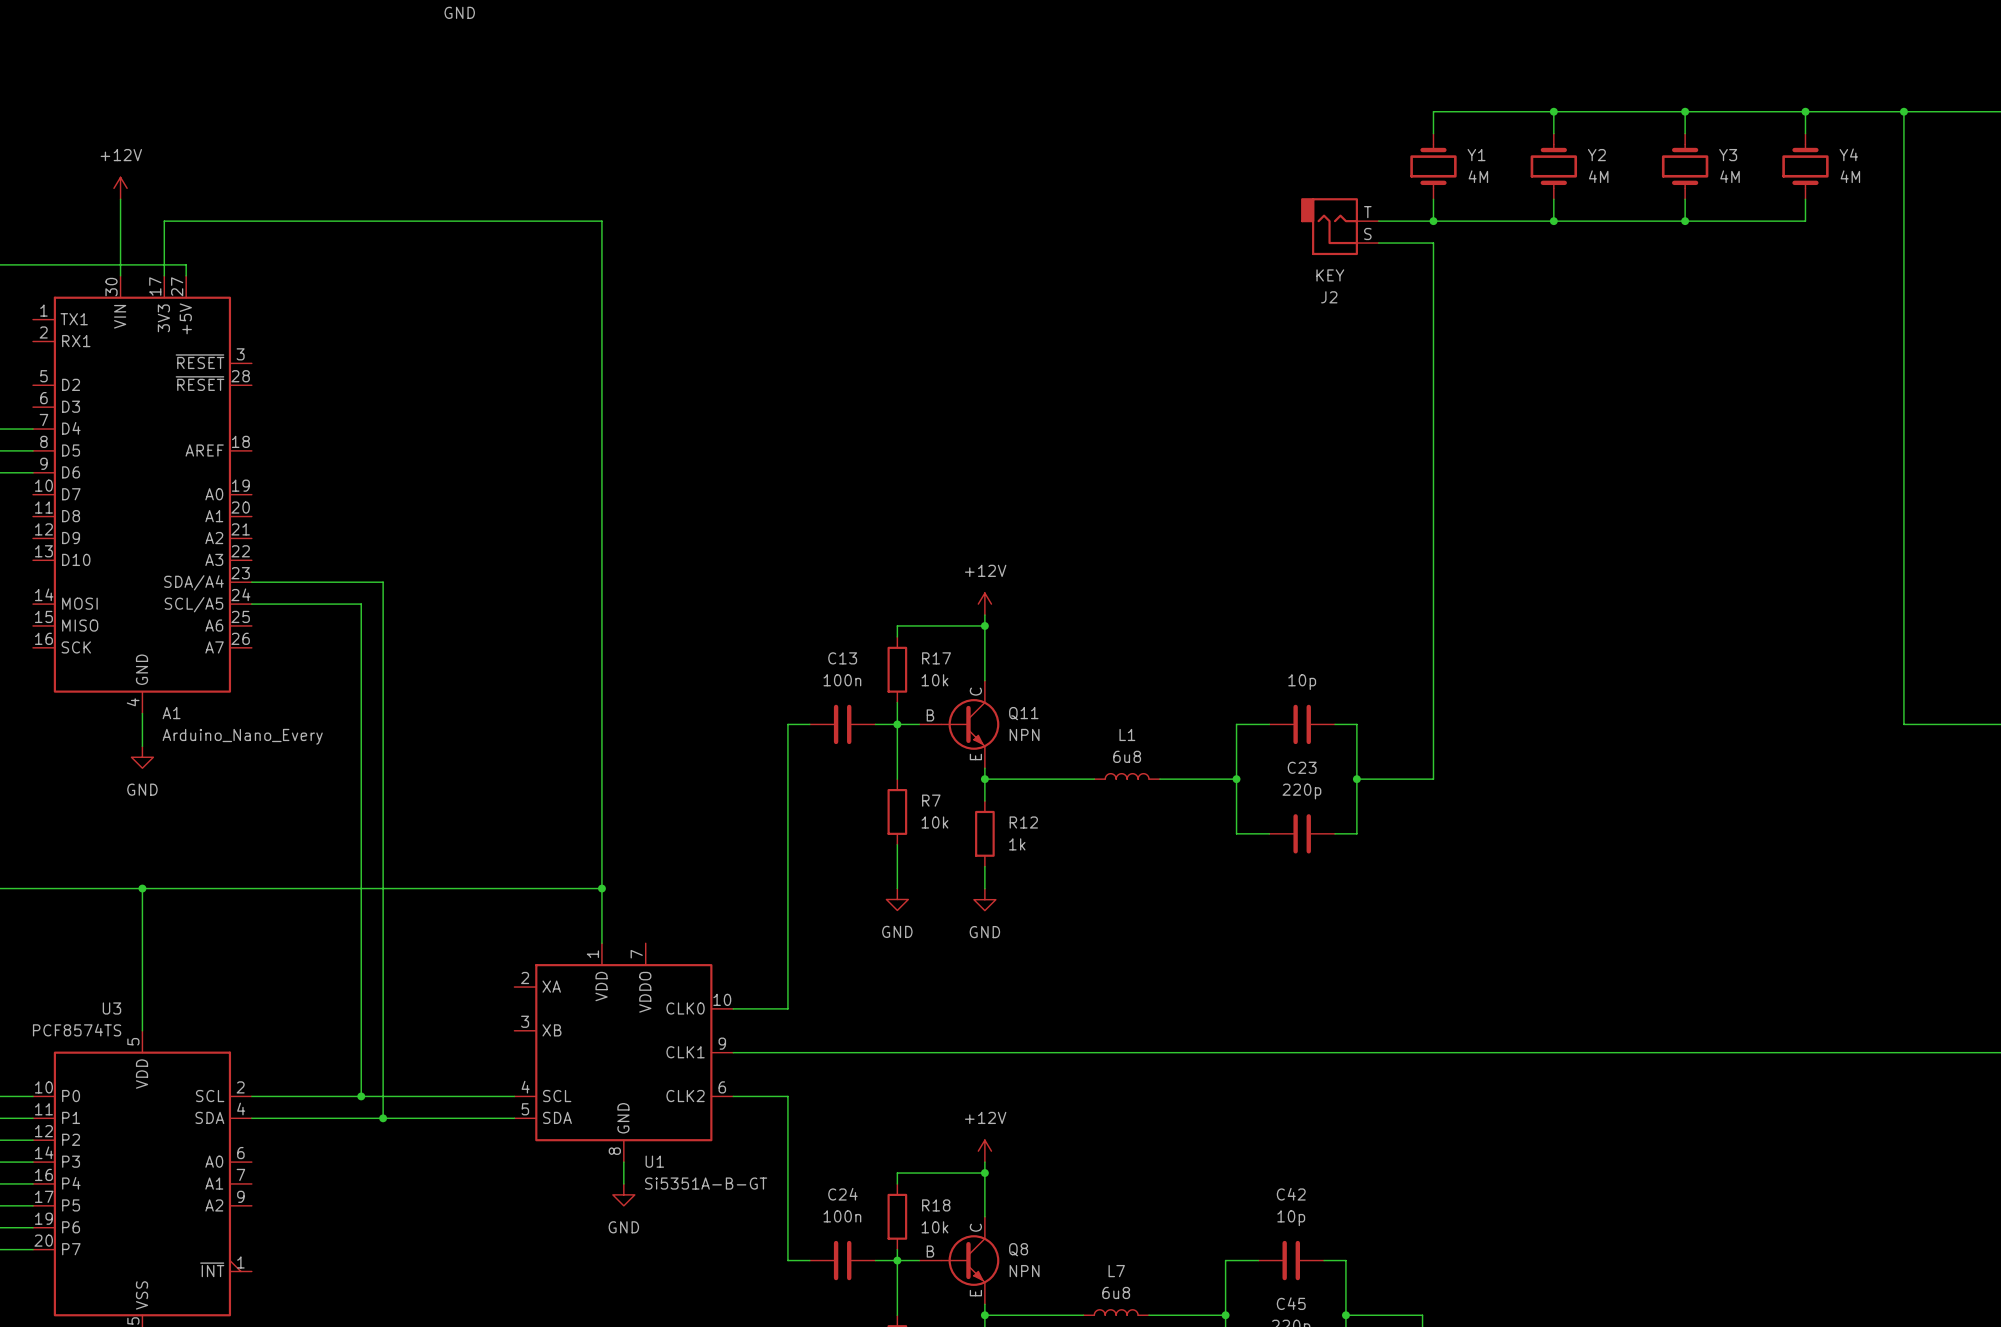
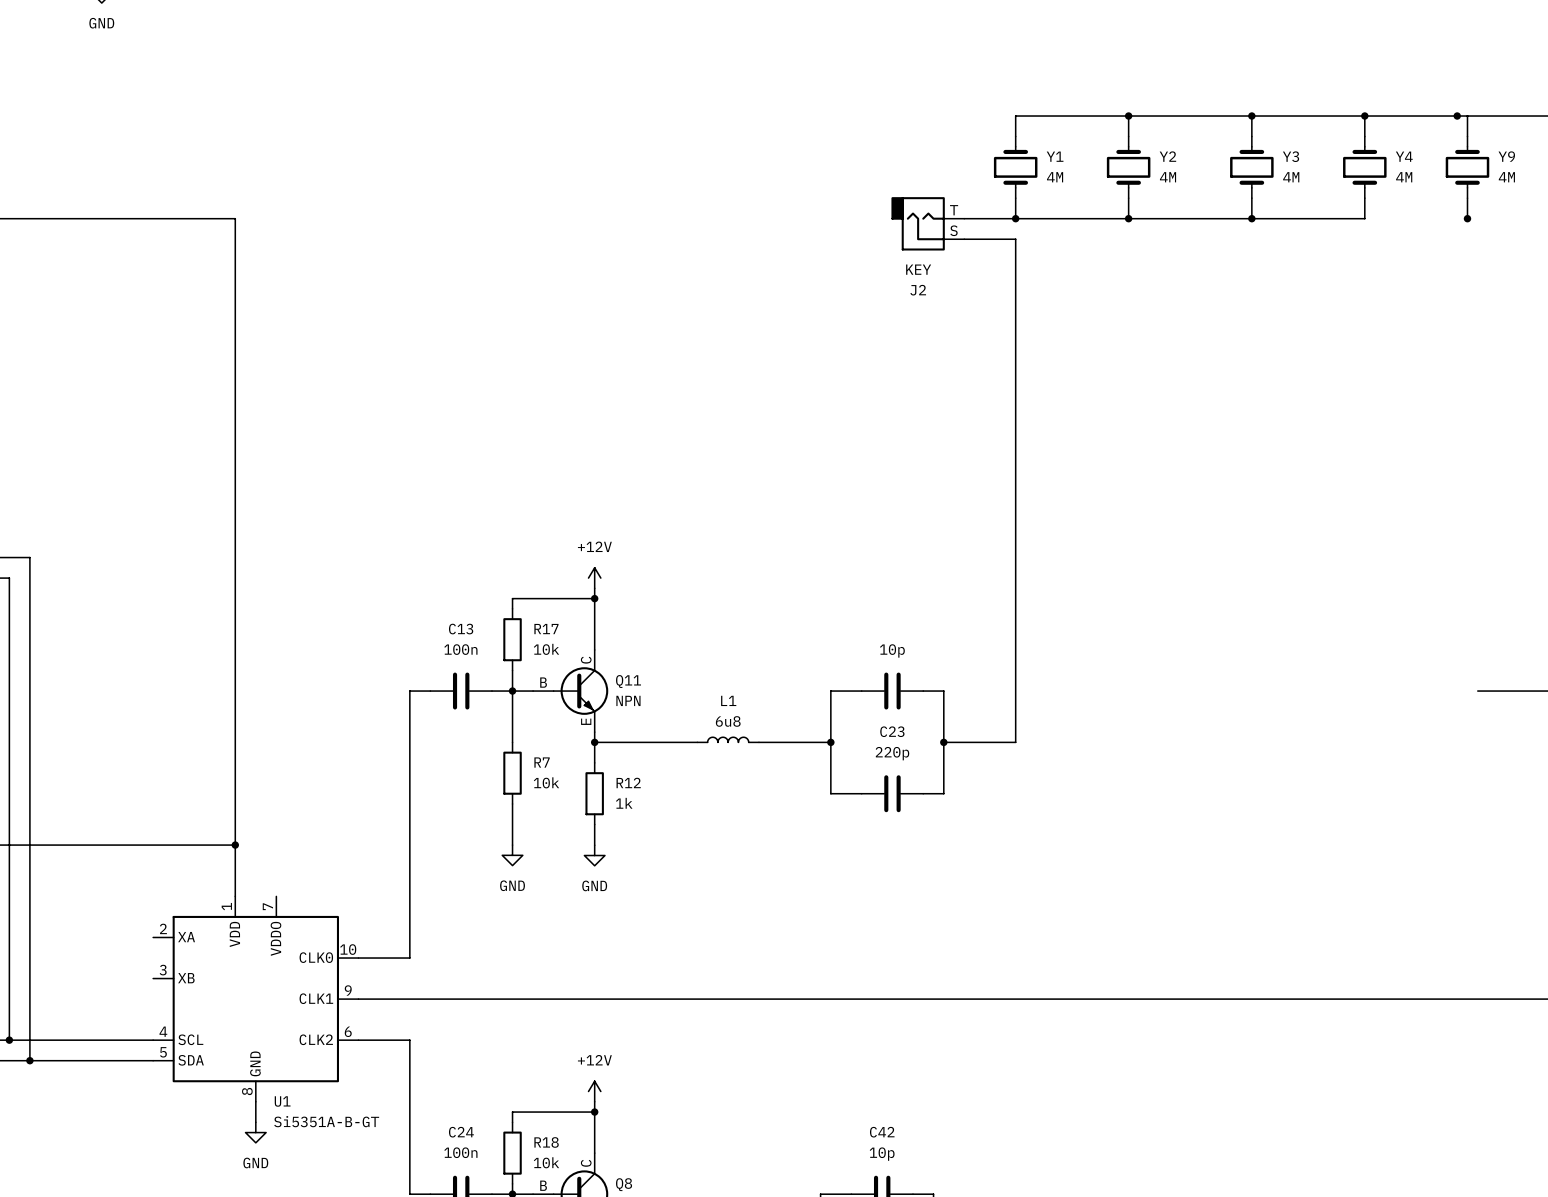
wire: (1903, 111) (1903, 724) (1925, 724) -> none
wire: none -> (1467, 116) (1467, 136)
Y9: none -> 4M (1467, 167)
wire: none -> (1467, 198) (1467, 218)
junction: none -> (1467, 218)

